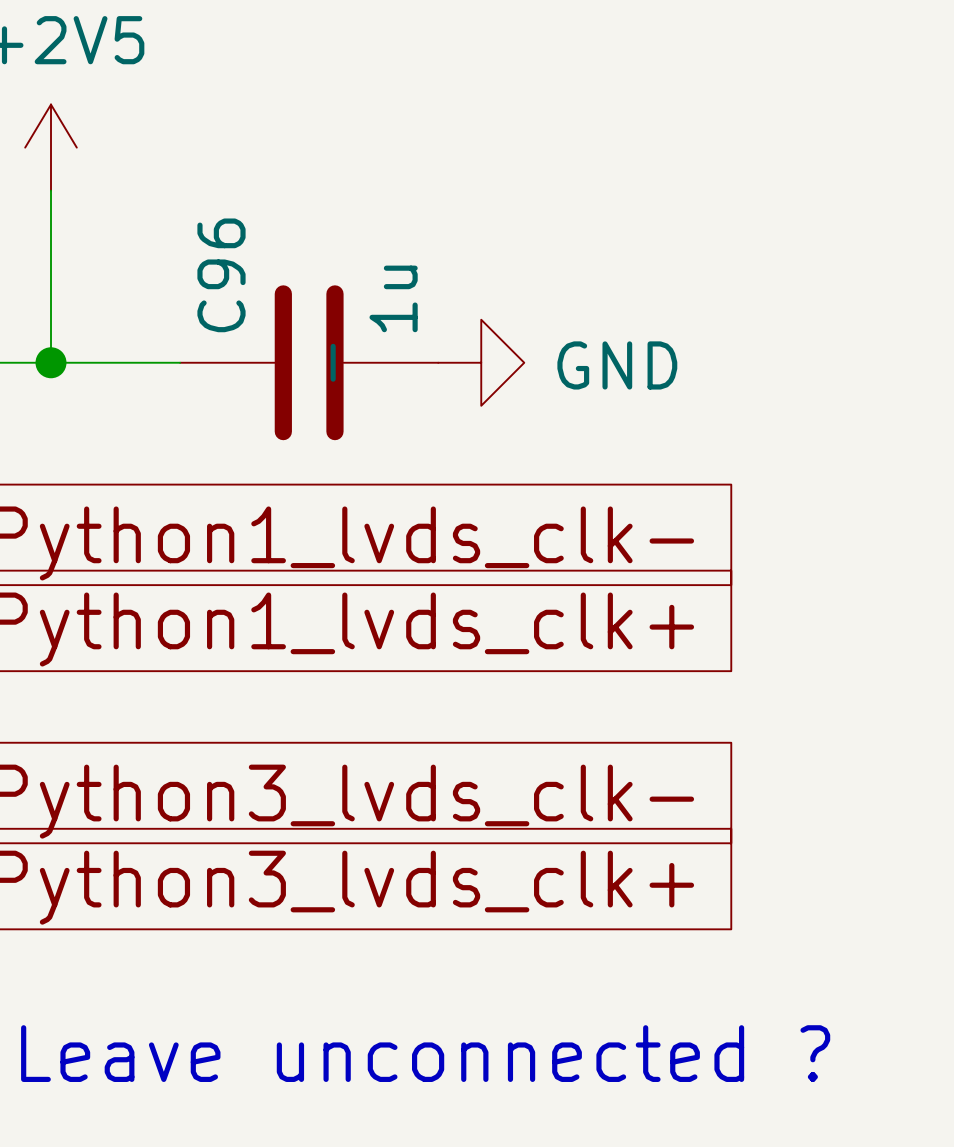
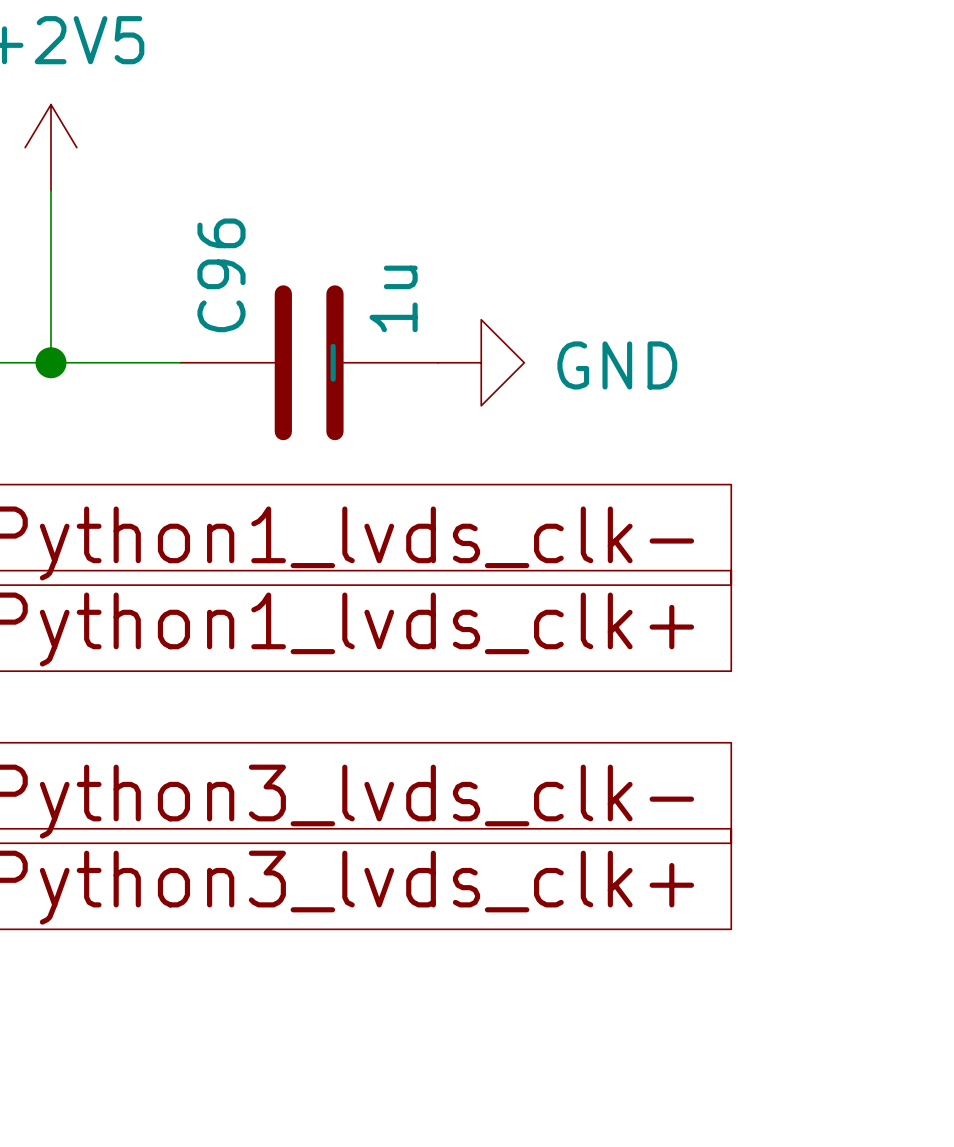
text: Leave unconnected ? (425, 1053) -> none

